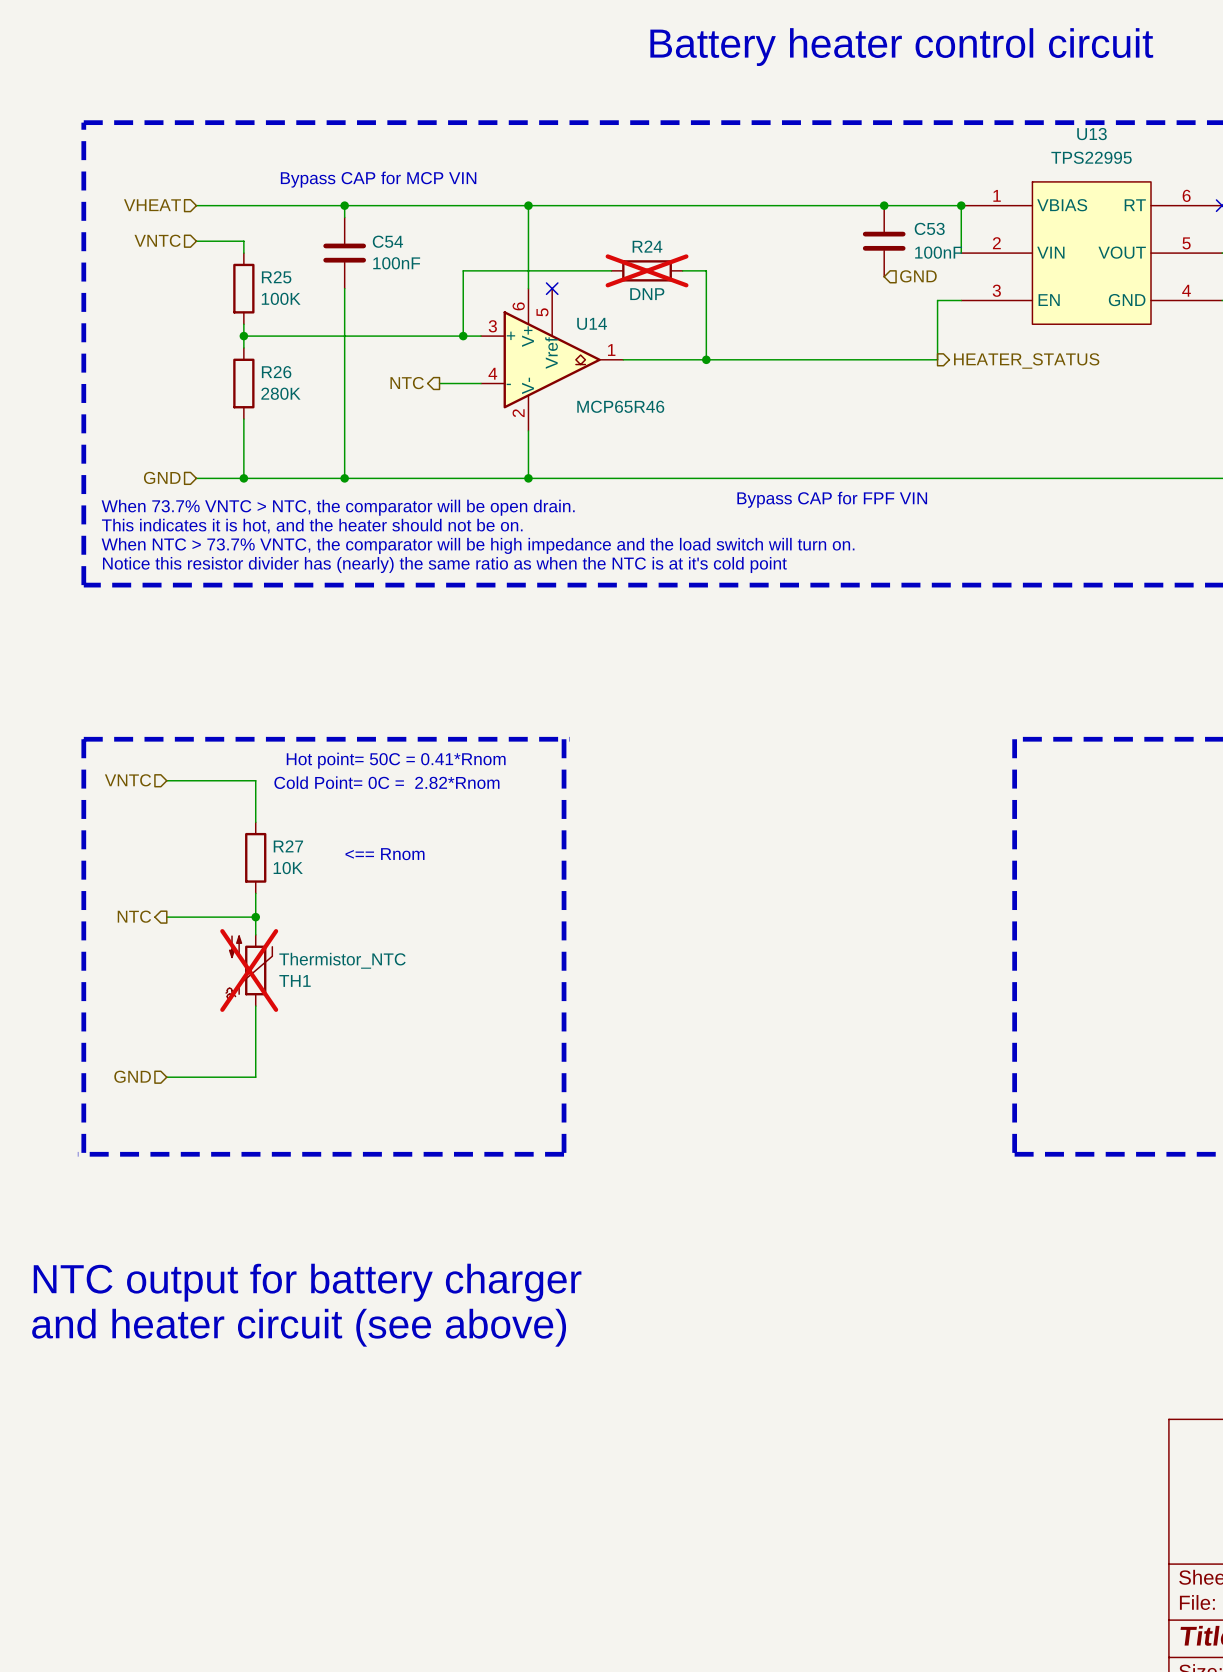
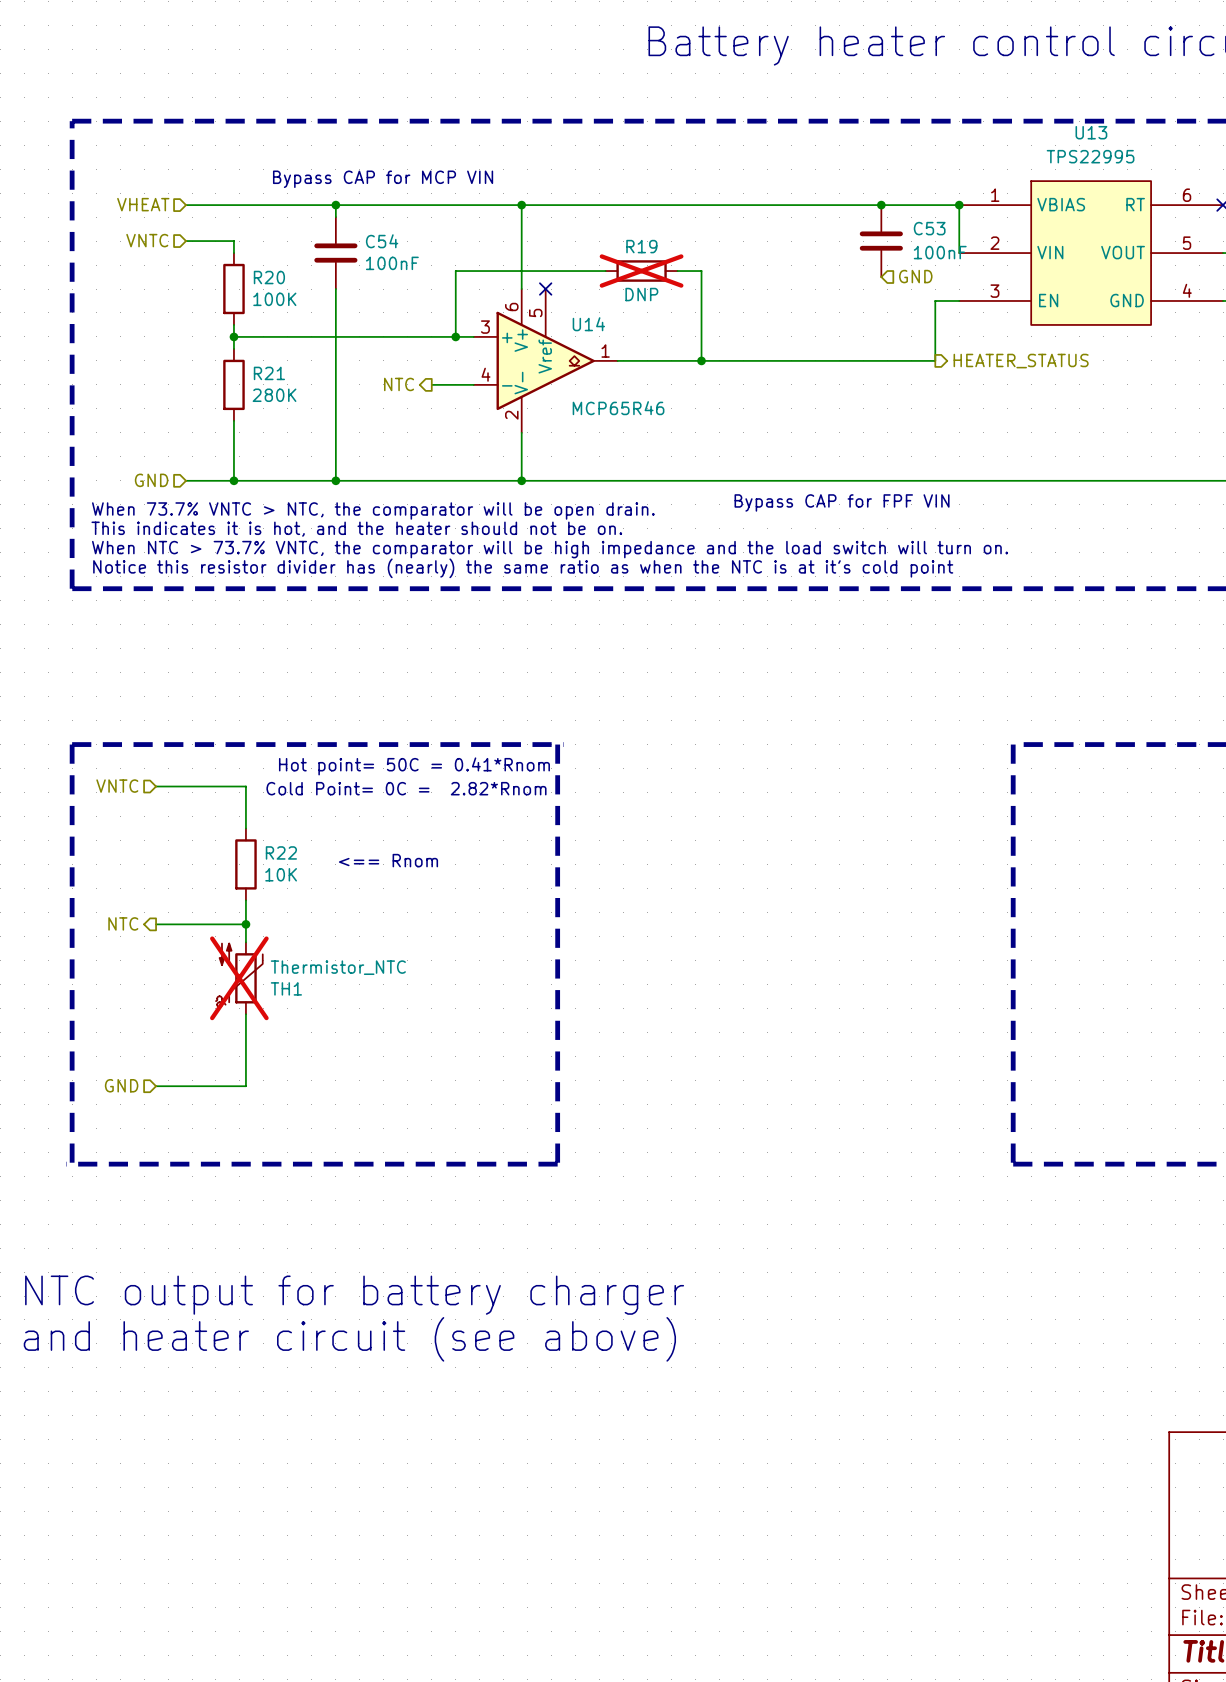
R24 name: R24 (647, 246) -> R19 (641, 246)
R25 name: R25 (276, 277) -> R20 (269, 277)
R26 name: R26 (276, 372) -> R21 (269, 373)
R27 name: R27 (288, 846) -> R22 (281, 852)

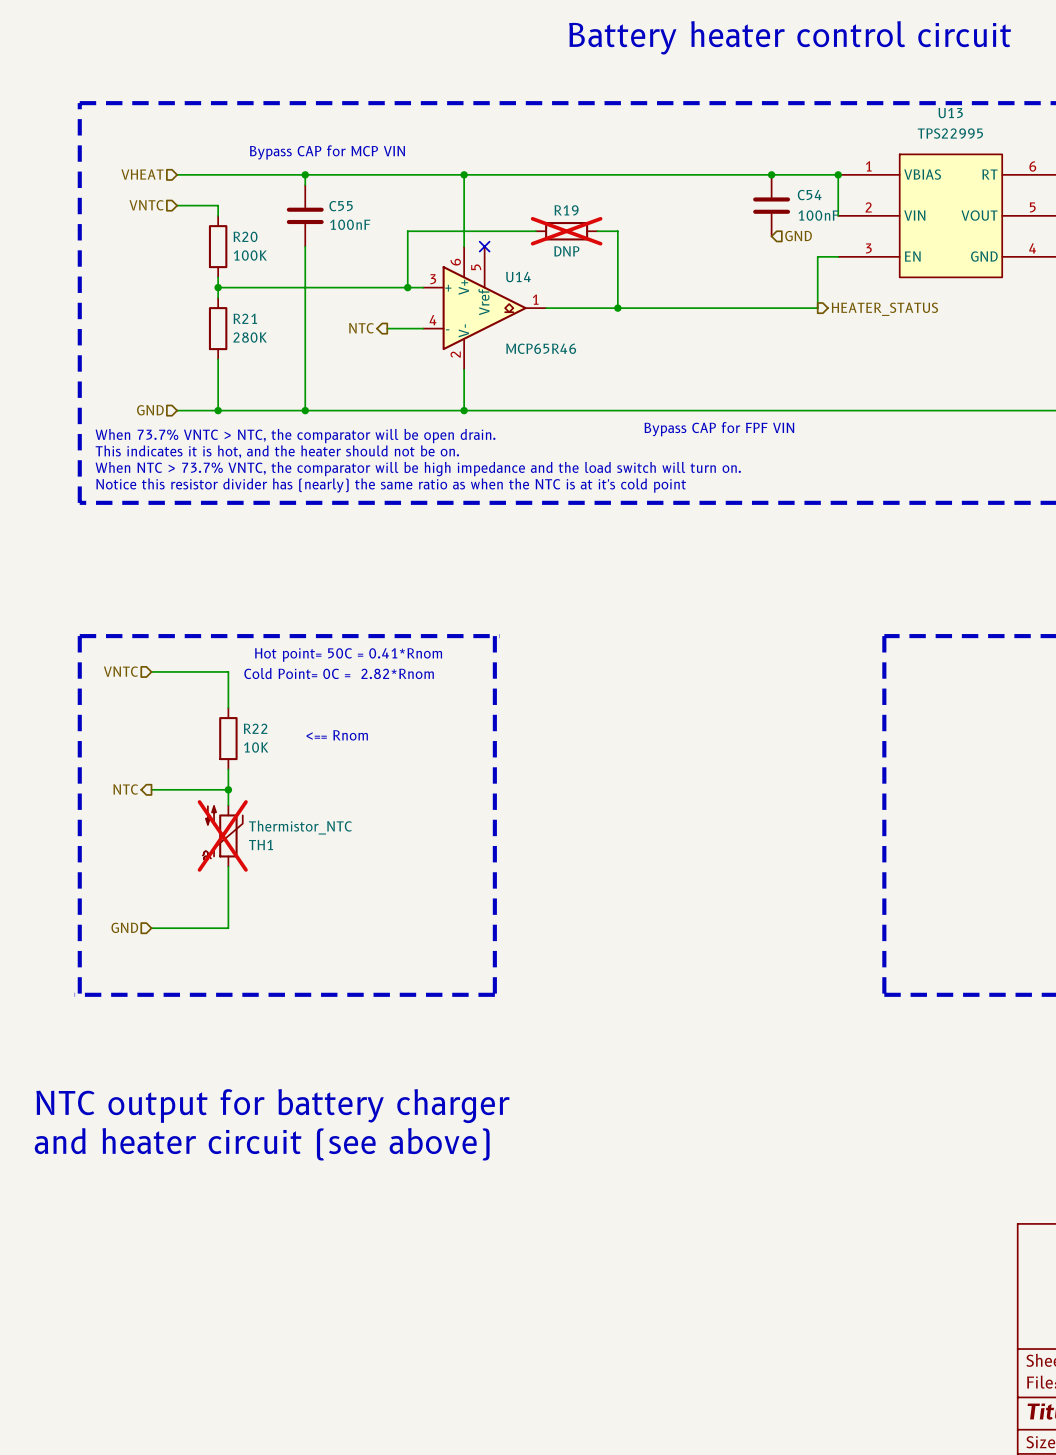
C53 name: C53 (929, 228) -> C54 (809, 195)
C54 name: C54 (382, 241) -> C55 (341, 206)

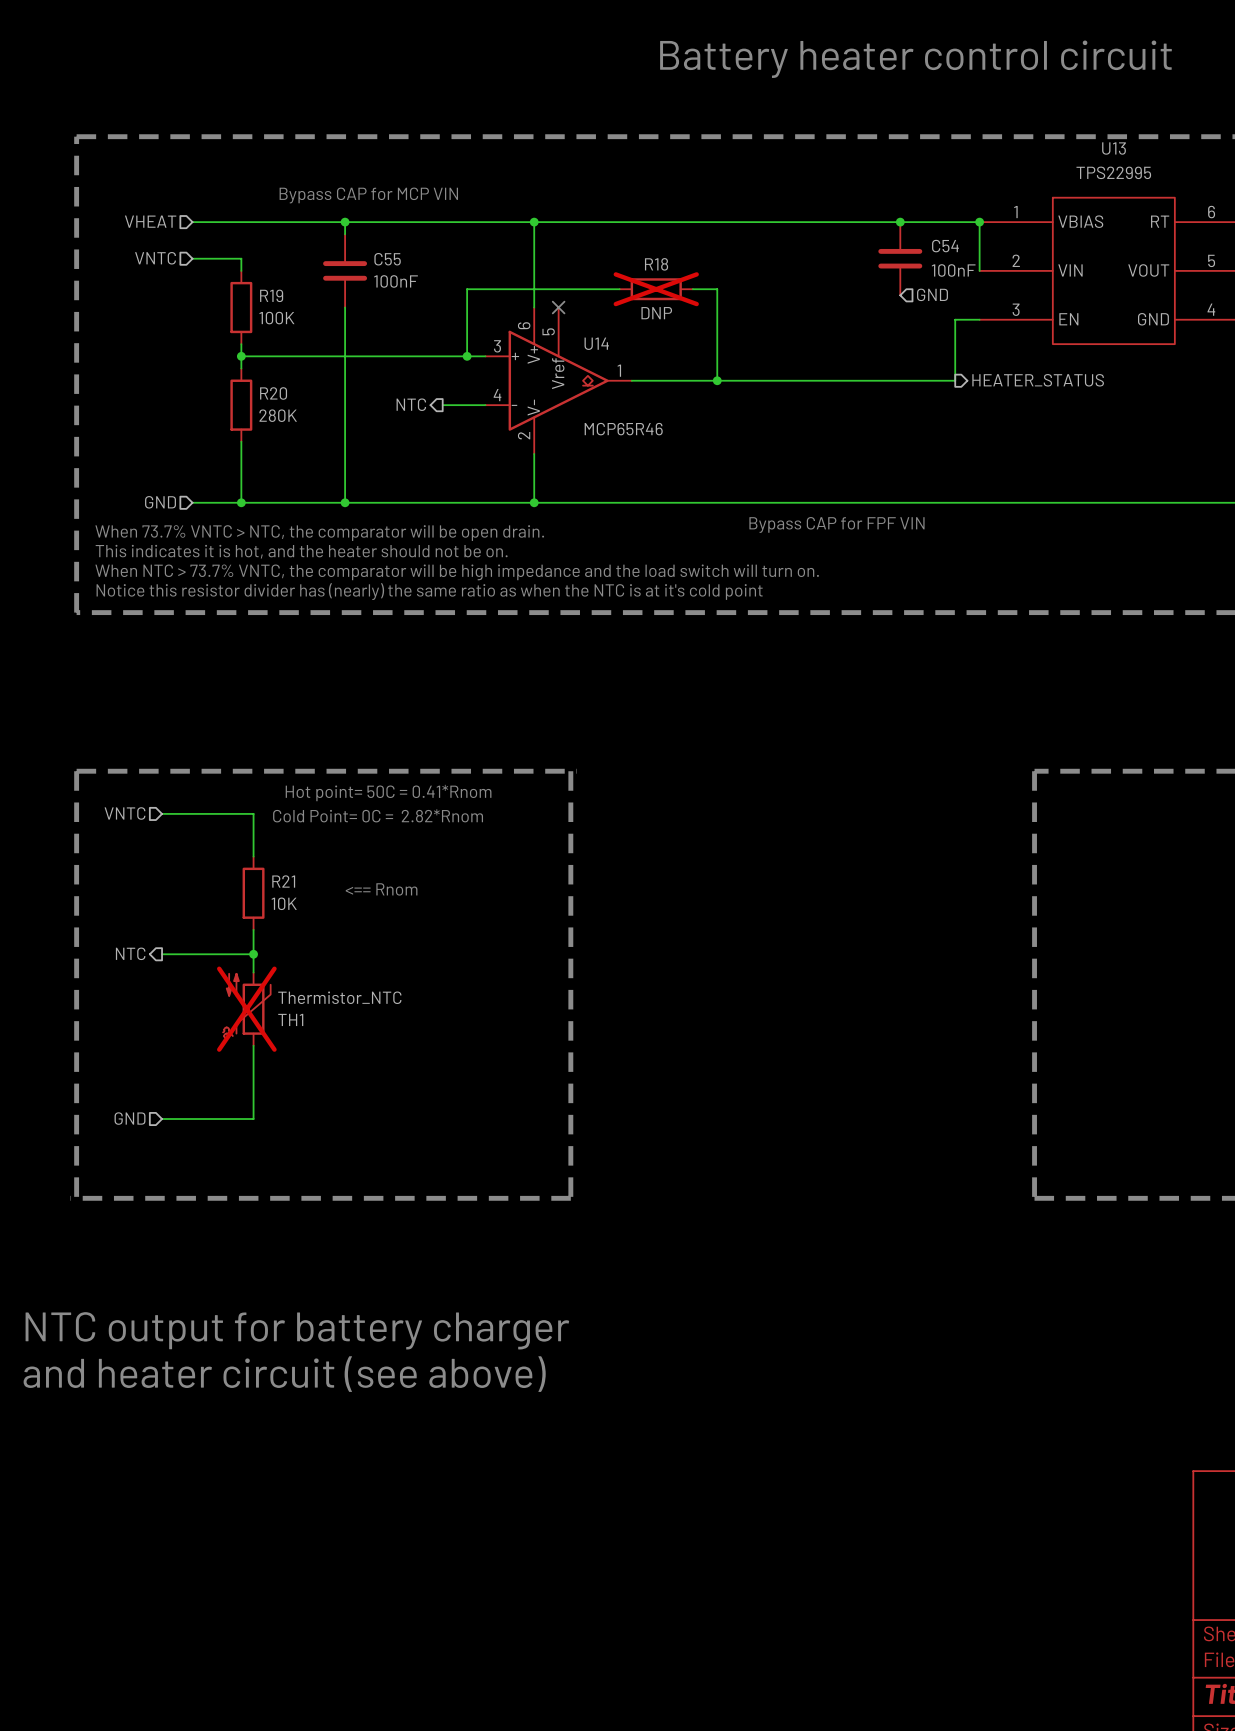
R19 name: R19 (566, 210) -> R18 (656, 264)
R20 name: R20 (245, 236) -> R19 (271, 295)
R21 name: R21 (245, 318) -> R20 (273, 393)
R22 name: R22 (255, 728) -> R21 (283, 881)

